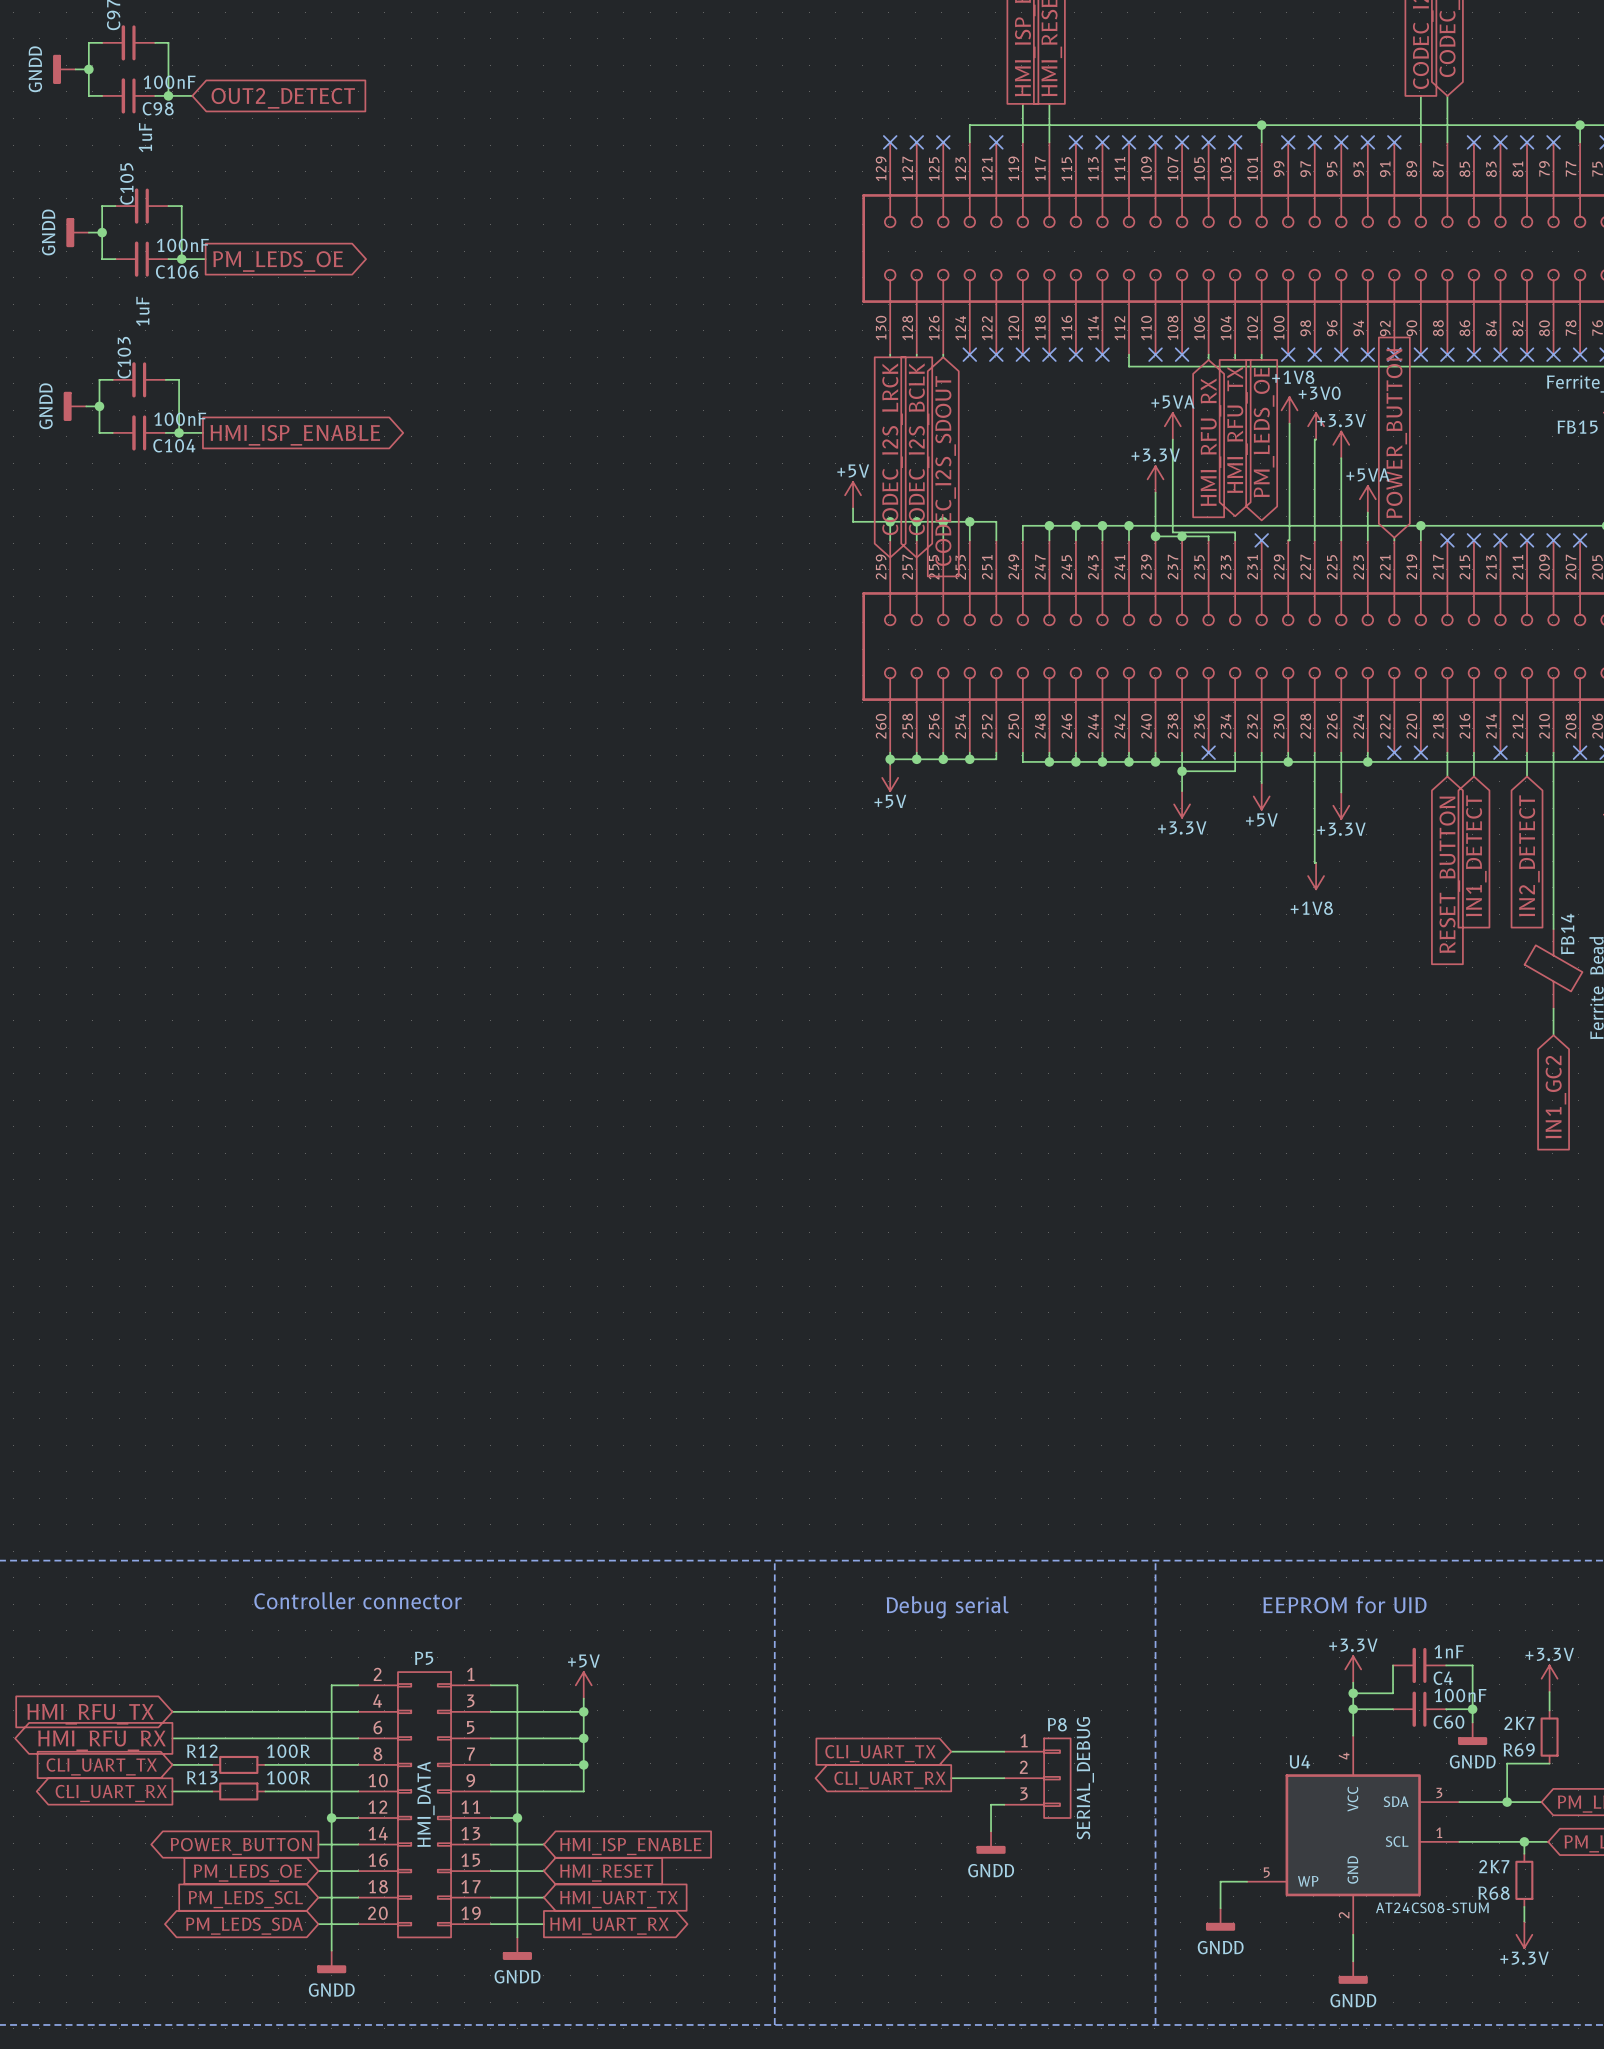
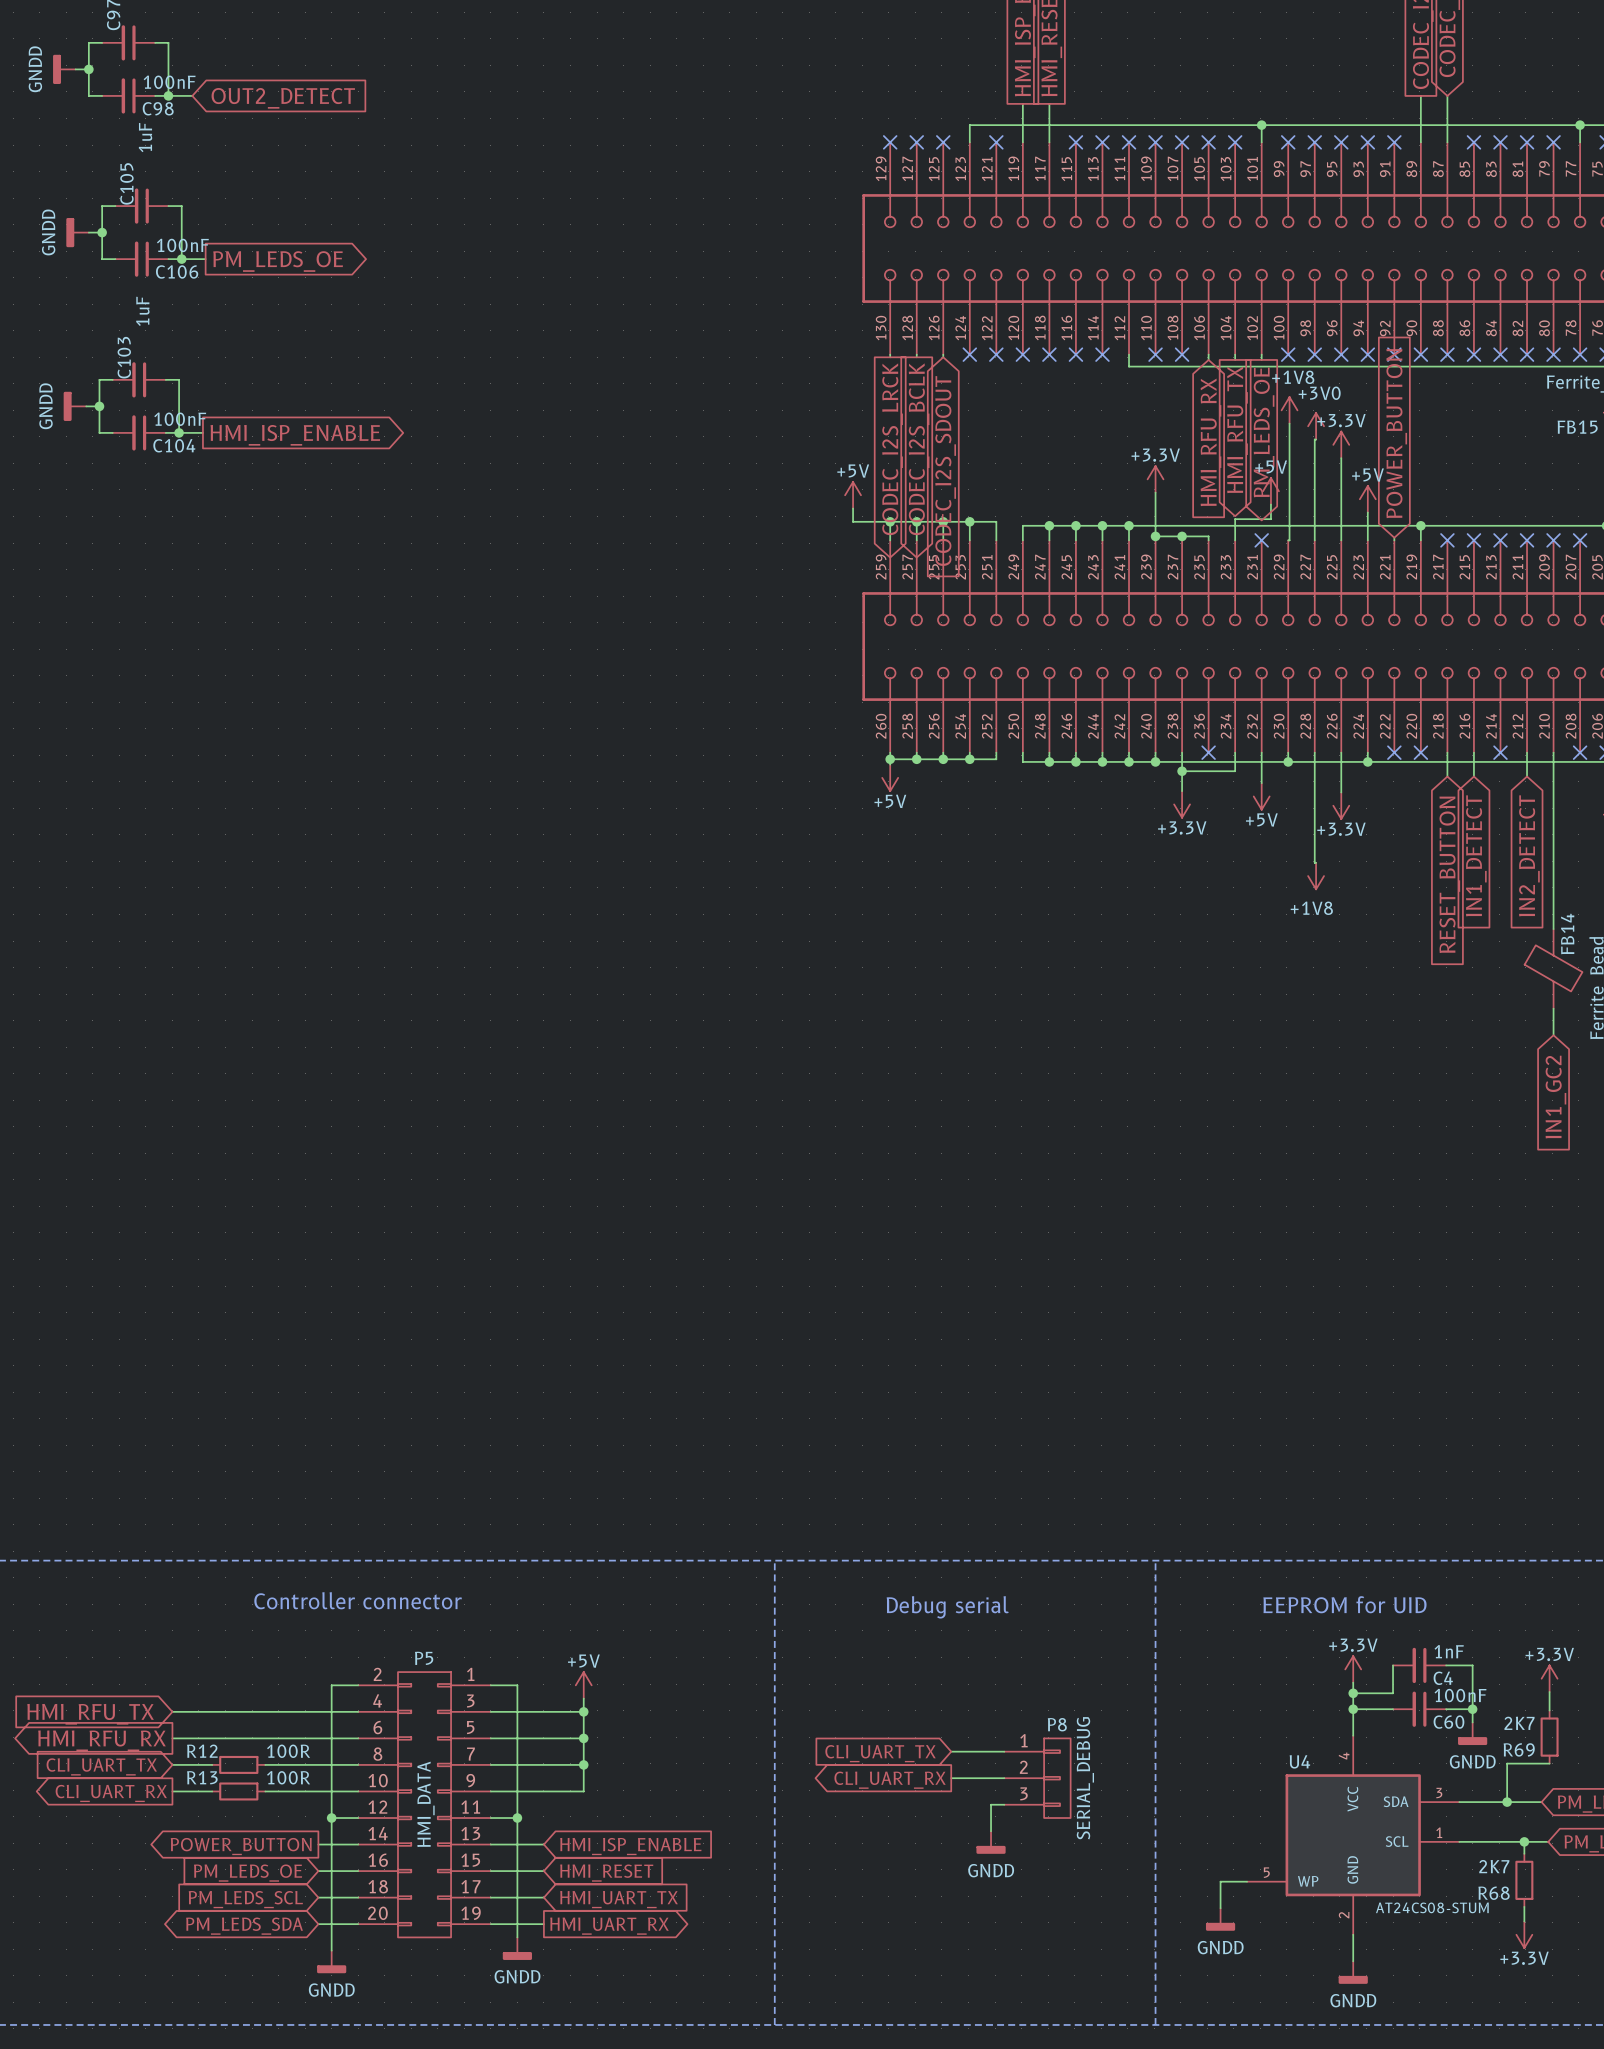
power symbol: +5VA (1172, 426) -> none
wire: (1172, 439) (1172, 532) (1235, 532) -> (1270, 504) (1270, 519) (1235, 519) (1235, 532)
power symbol: none -> +5V (1270, 491)
power symbol: +5VA (1367, 499) -> +5V (1367, 499)

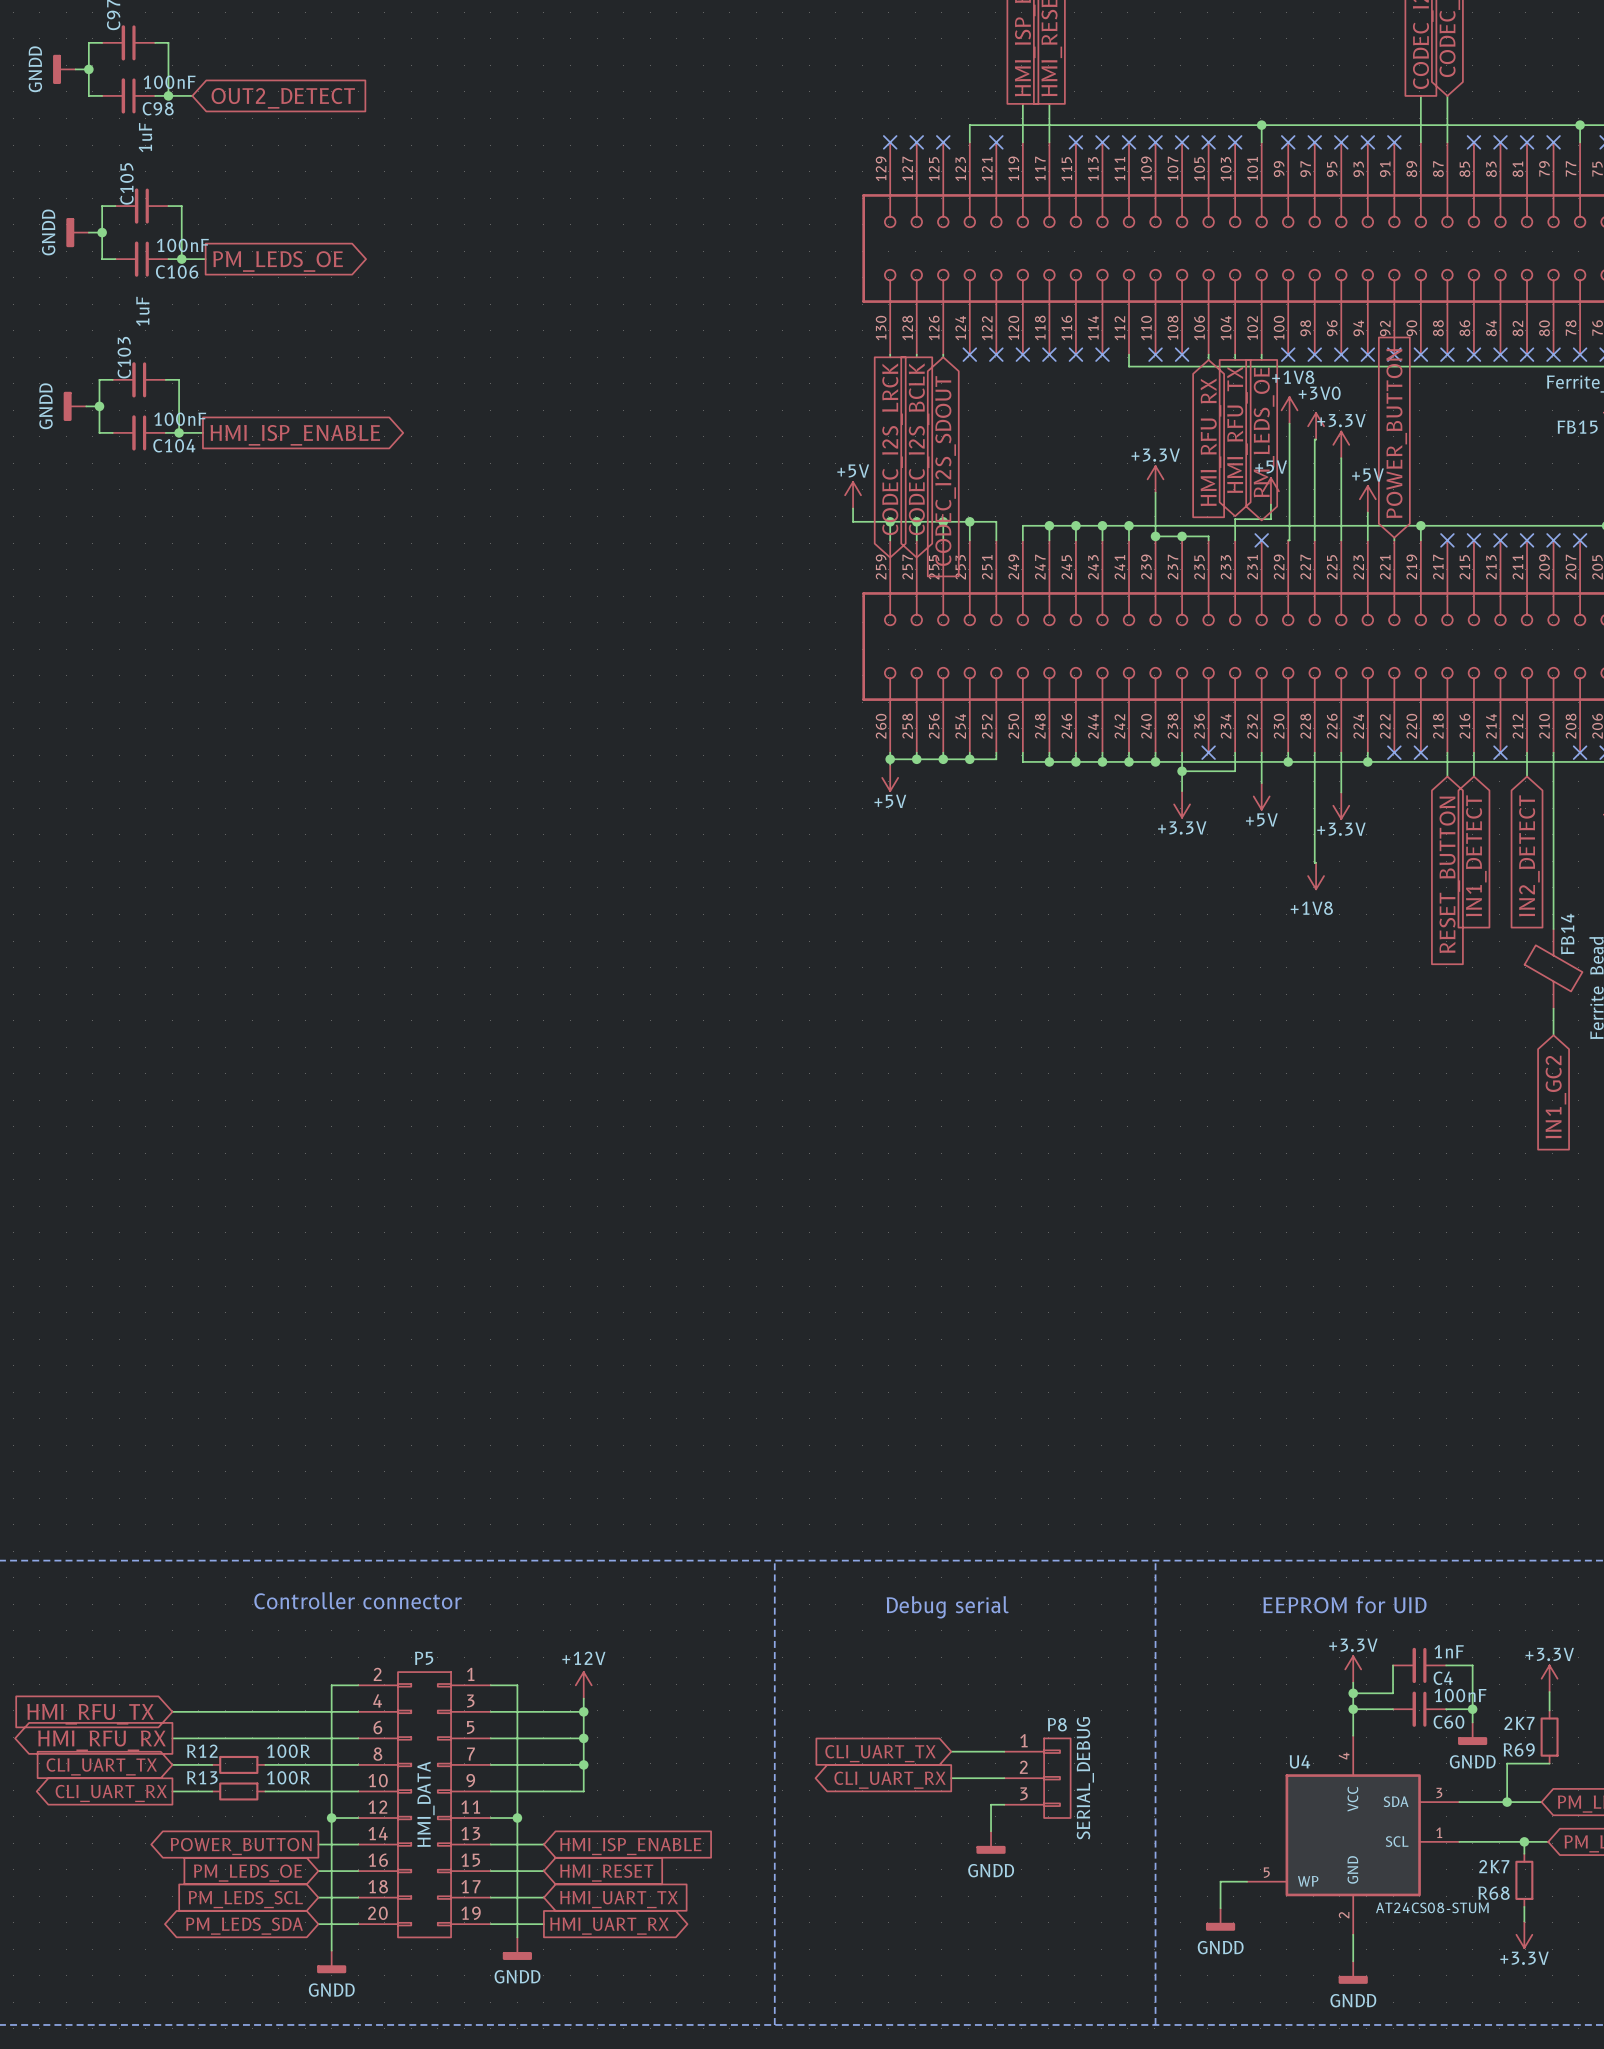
power symbol: +5V (583, 1685) -> +12V (583, 1685)

